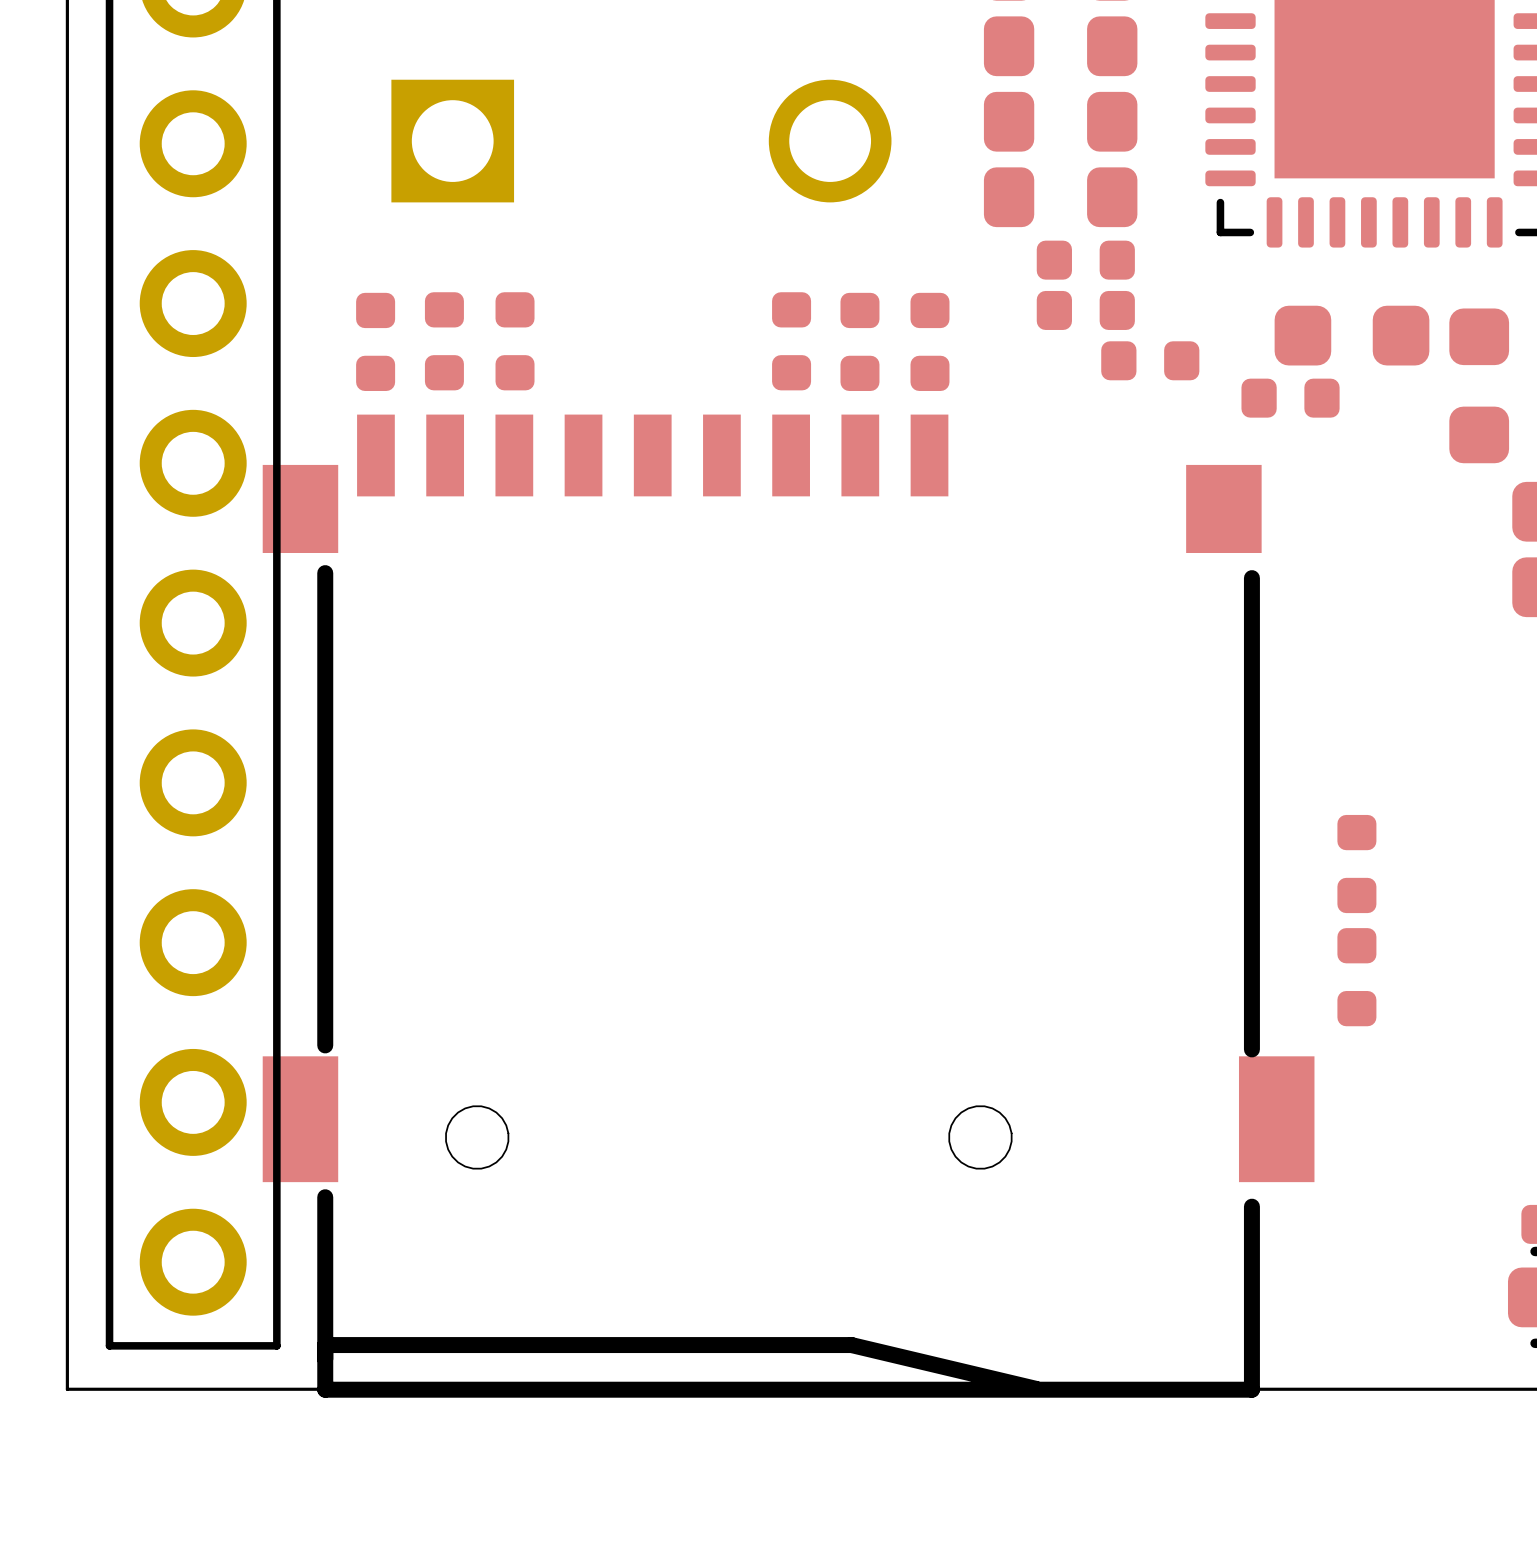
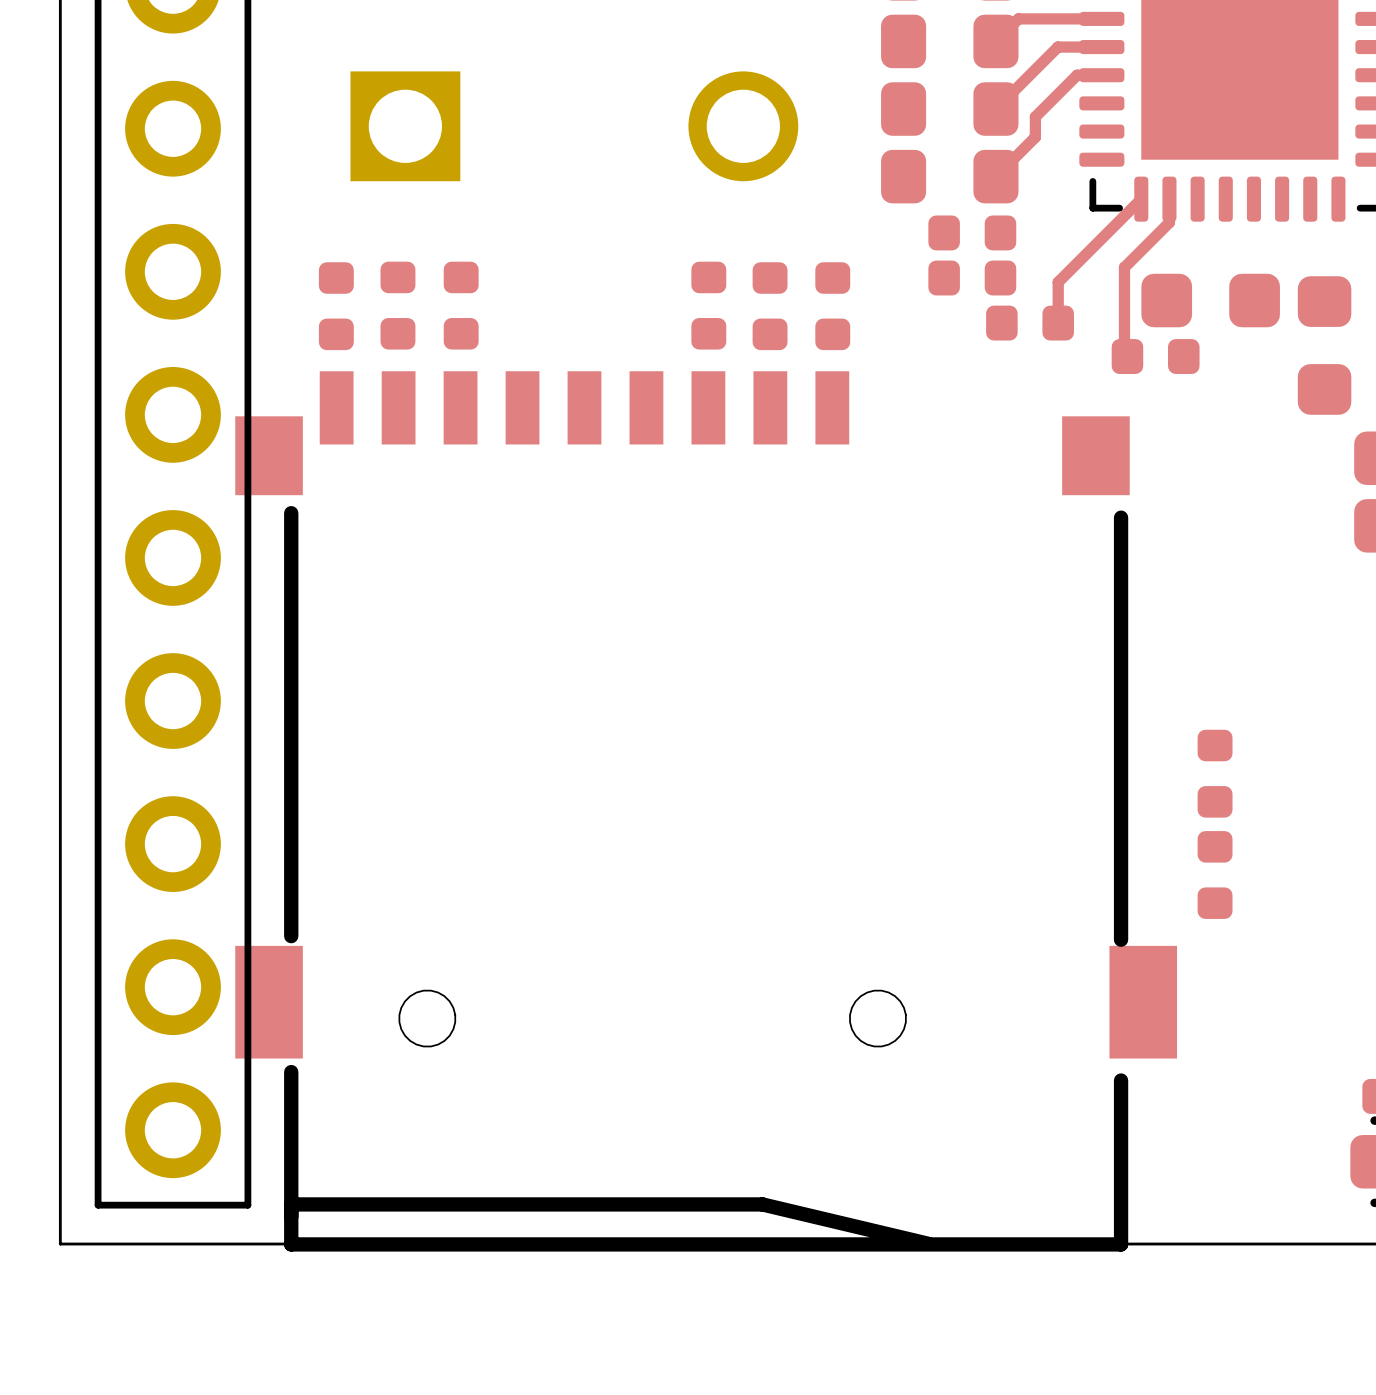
track: none -> (1101, 18) (1018, 18) (995, 41)
track: none -> (1101, 47) (1057, 47) (995, 109)
track: none -> (1101, 75) (1077, 75) (1035, 116) (1035, 137) (995, 176)
track: none -> (1141, 199) (1058, 282) (1058, 323)
track: none -> (1169, 199) (1169, 222) (1124, 267) (1124, 353) (1127, 356)

